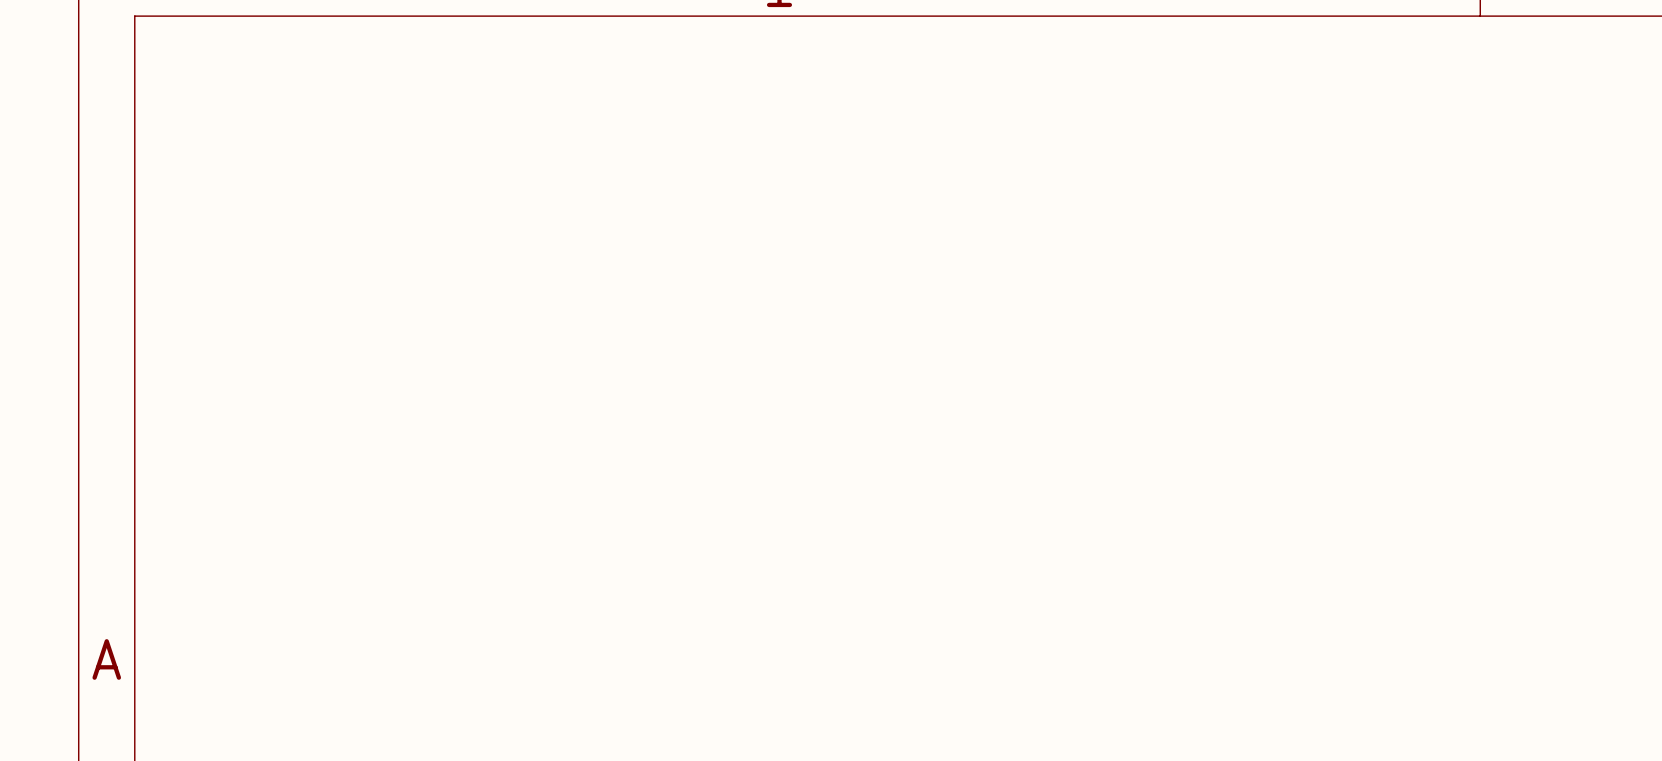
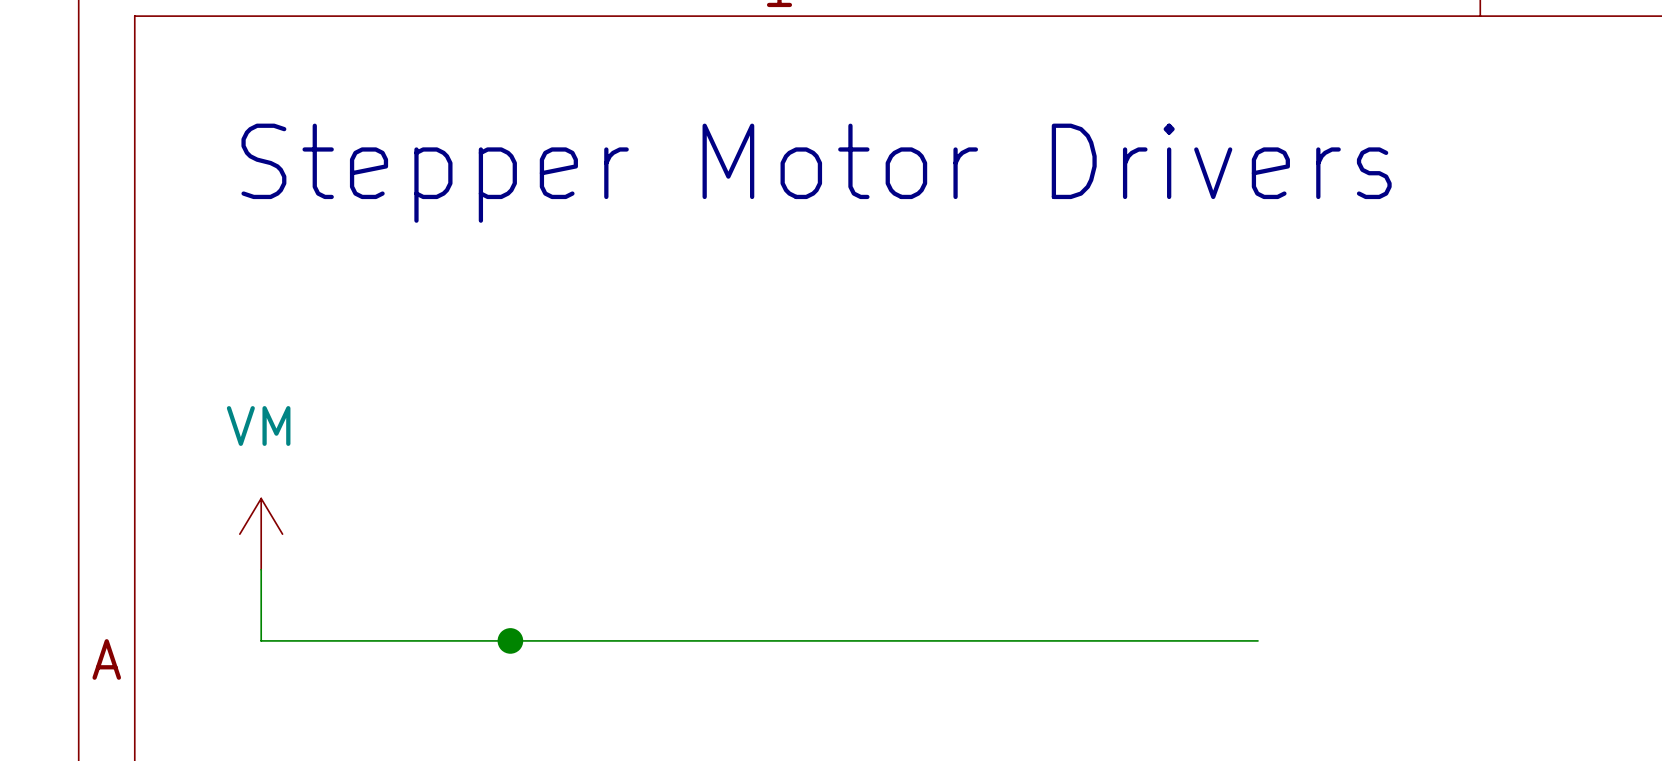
text: none -> Stepper Motor Drivers (816, 173)
power symbol: none -> VM (261, 534)
wire: none -> (261, 569) (261, 640) (1257, 640)
junction: none -> (510, 640)

